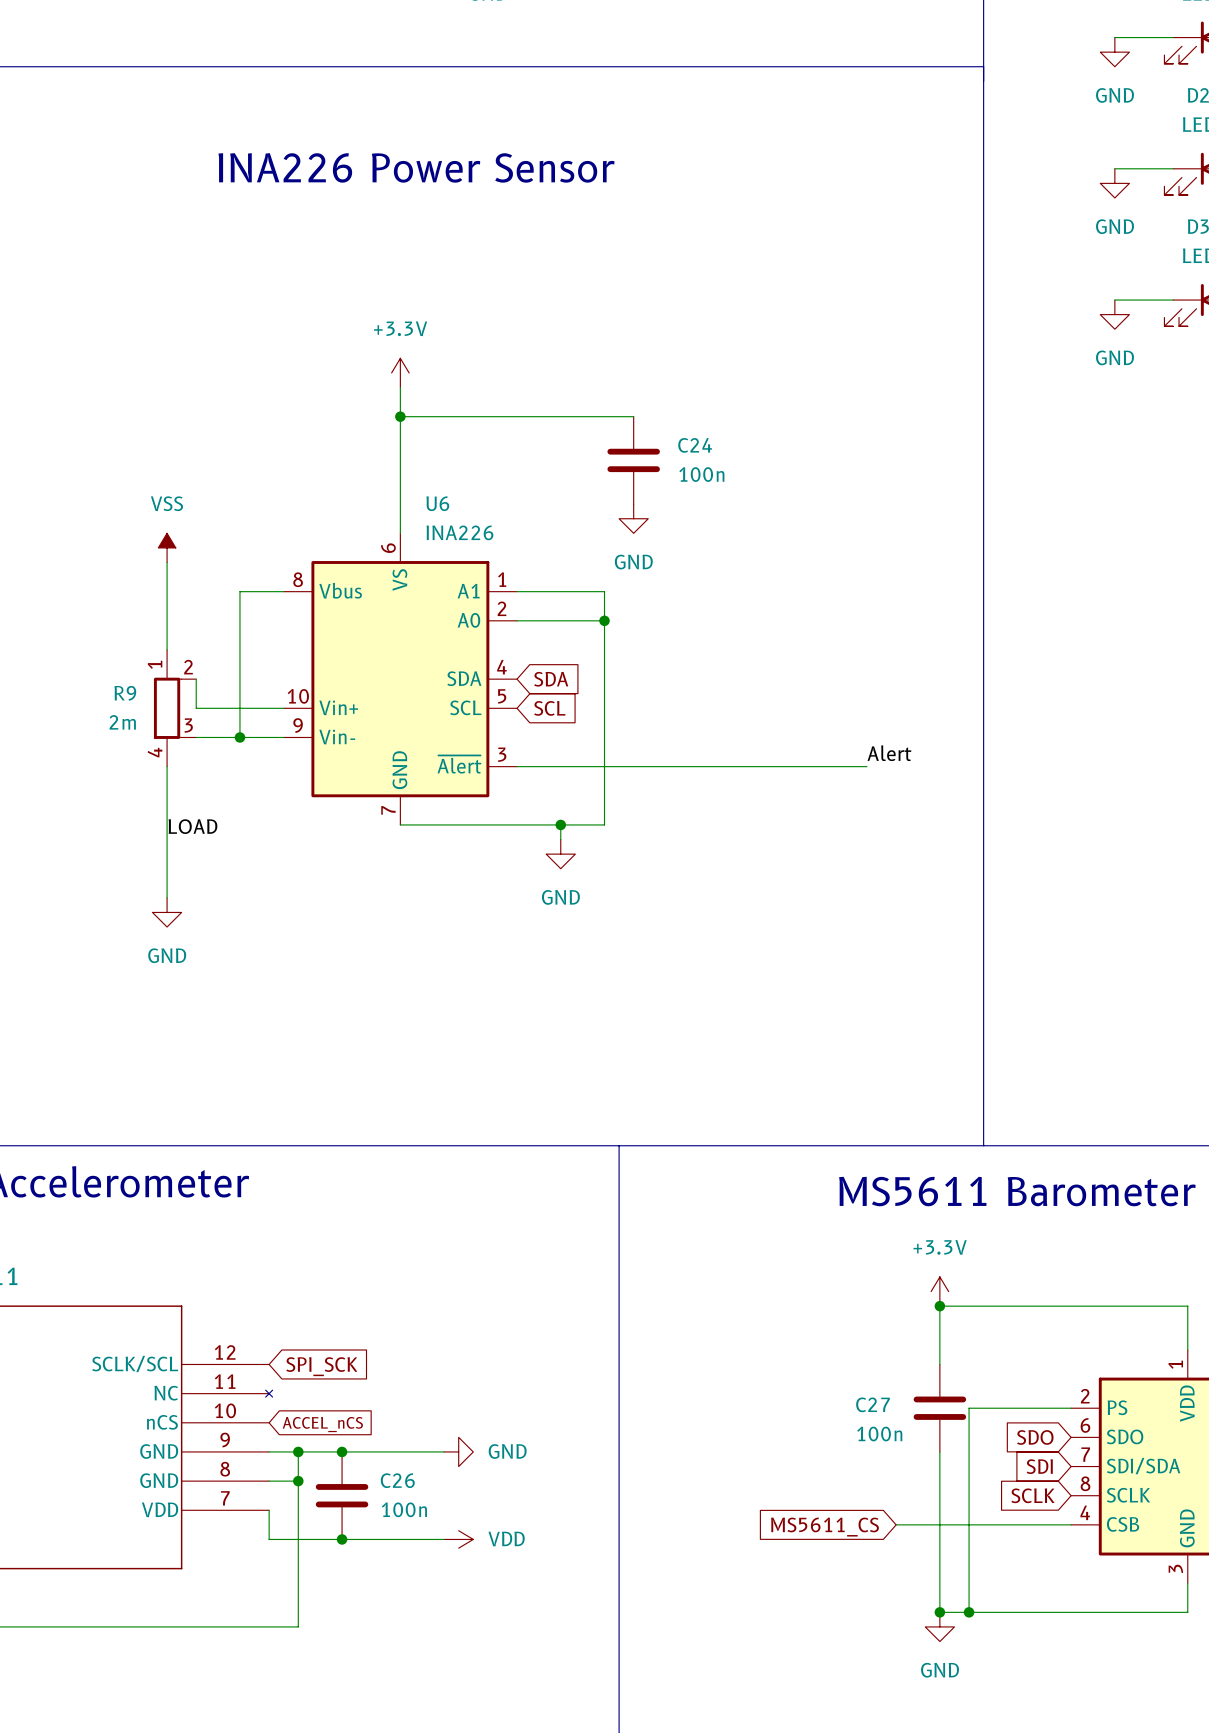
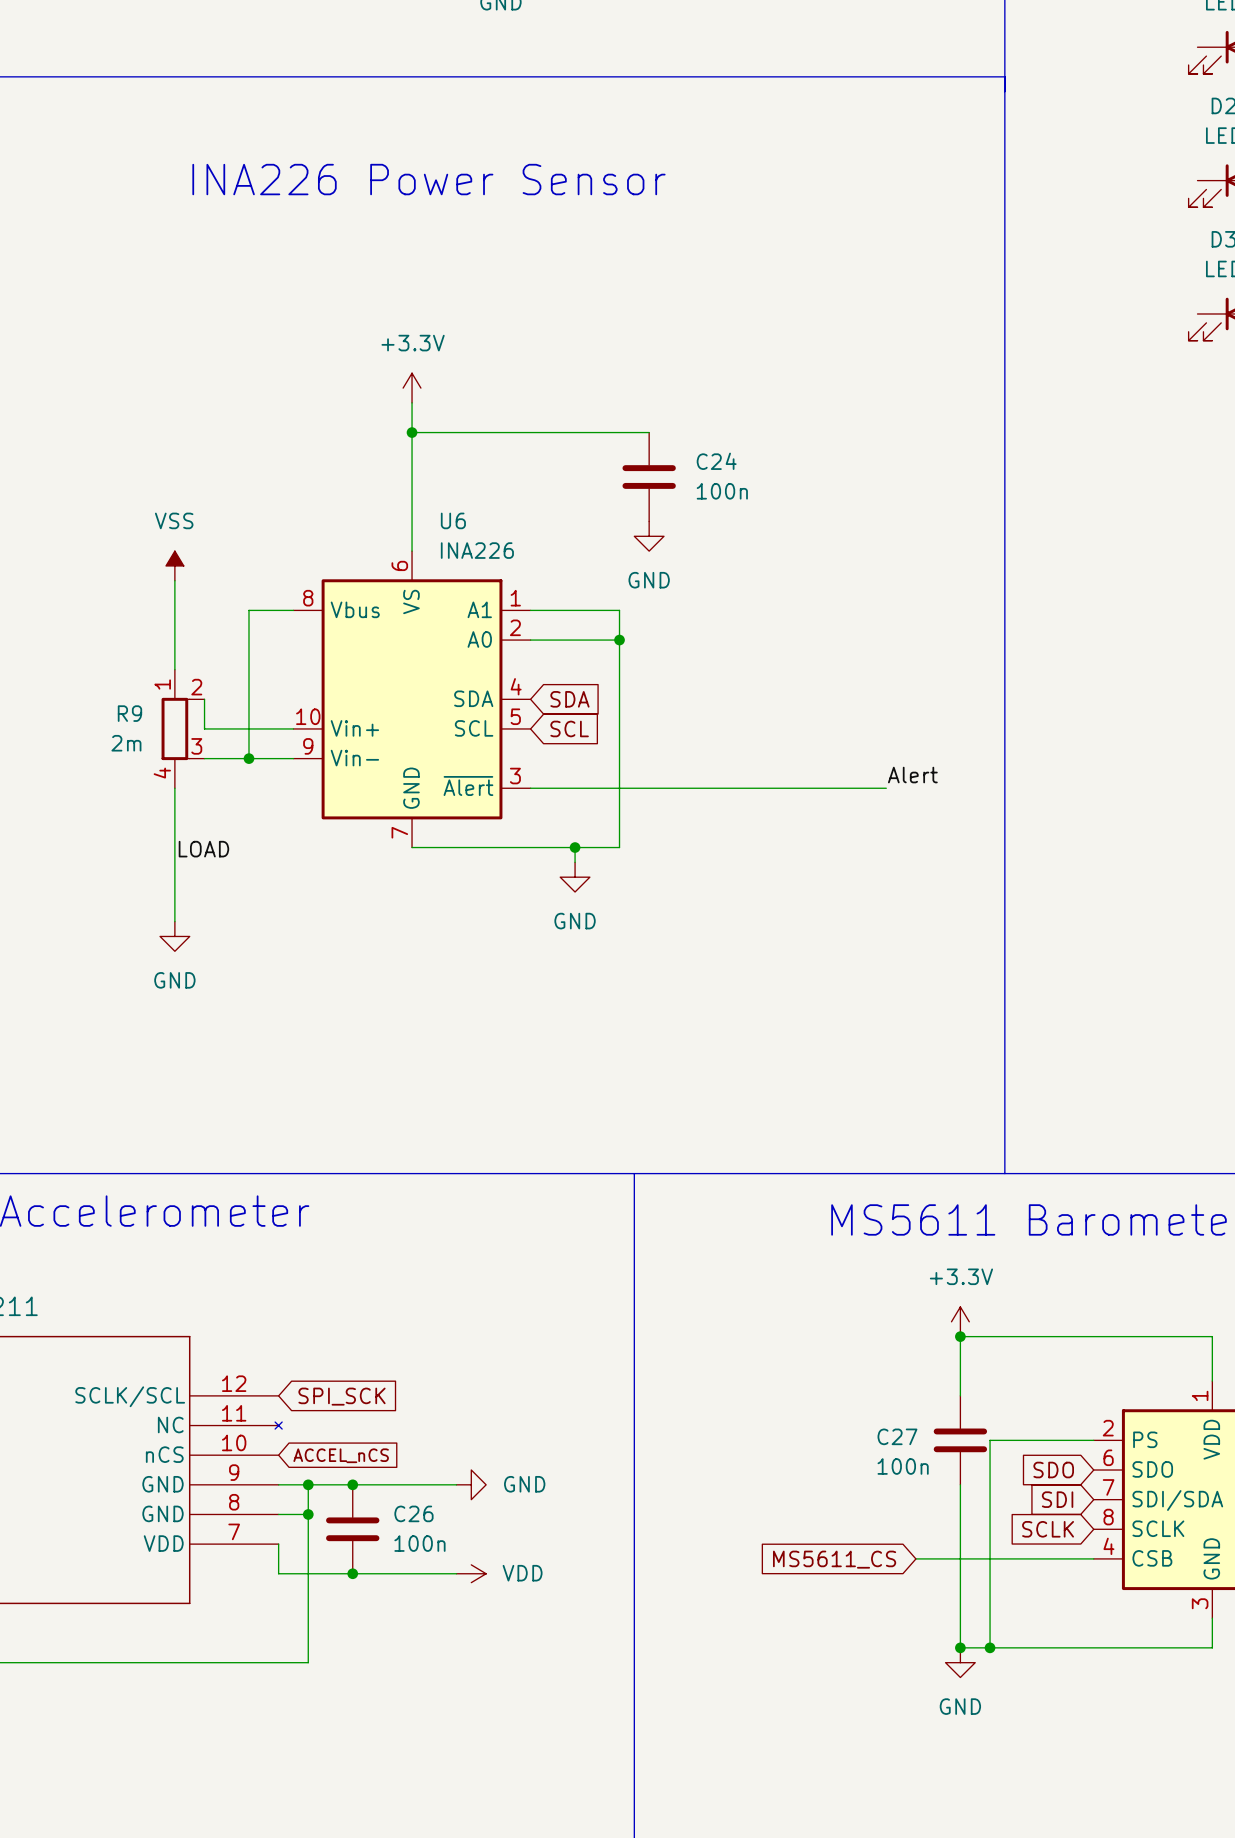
wire: (1114, 37) (1173, 37) -> none
power symbol: GND (1114, 52) -> none
wire: (1114, 168) (1173, 168) -> none
power symbol: GND (1114, 183) -> none
wire: (1114, 300) (1173, 300) -> none
power symbol: GND (1114, 314) -> none

